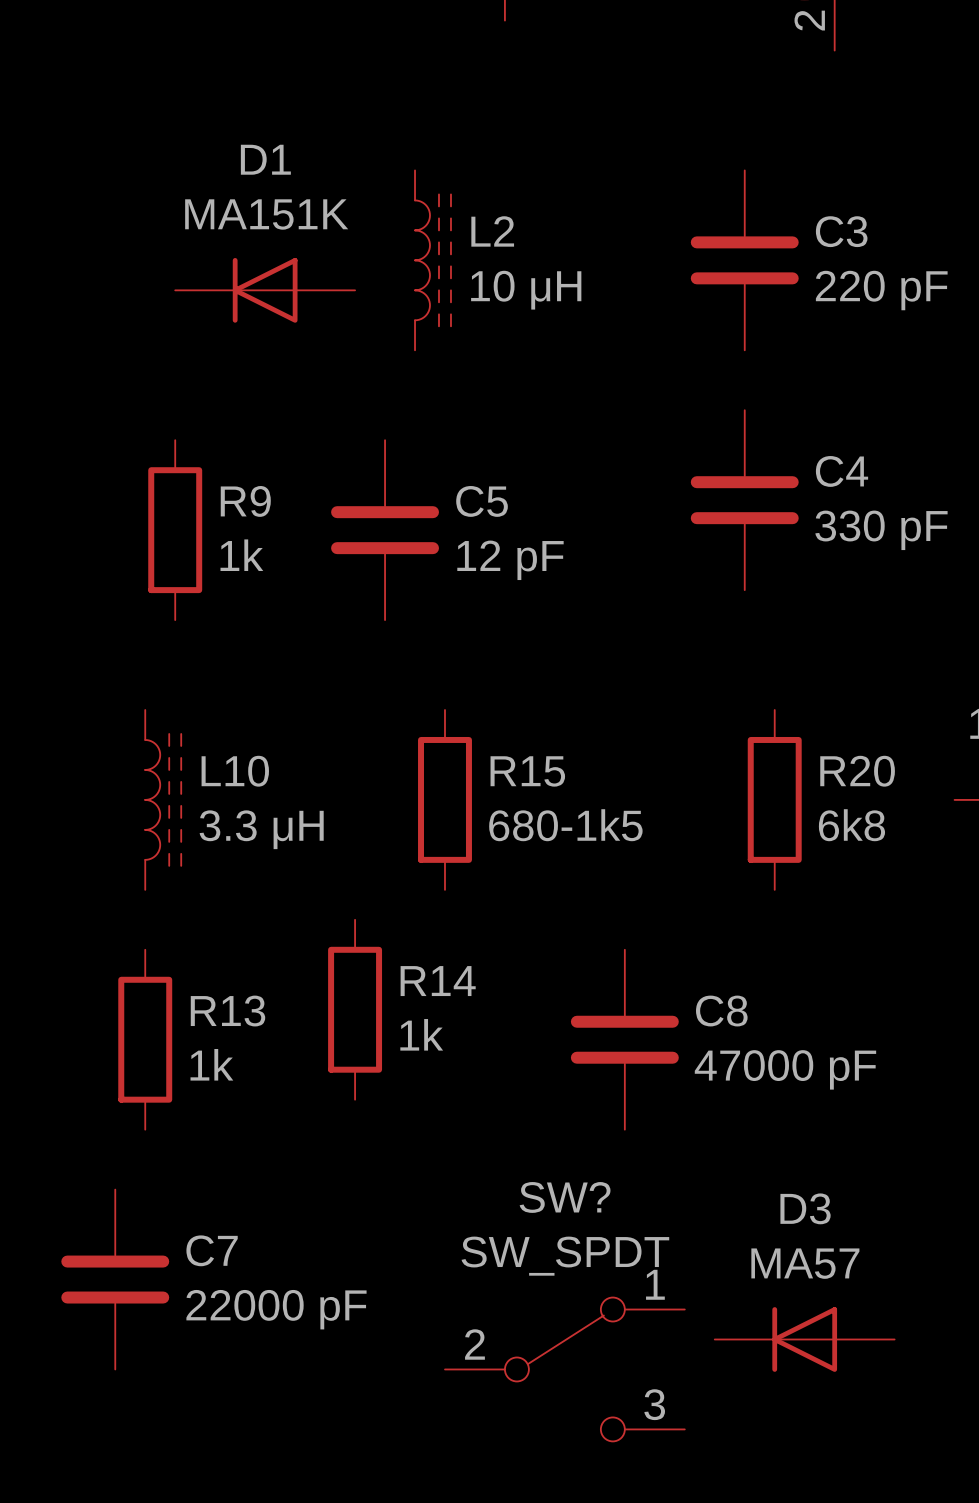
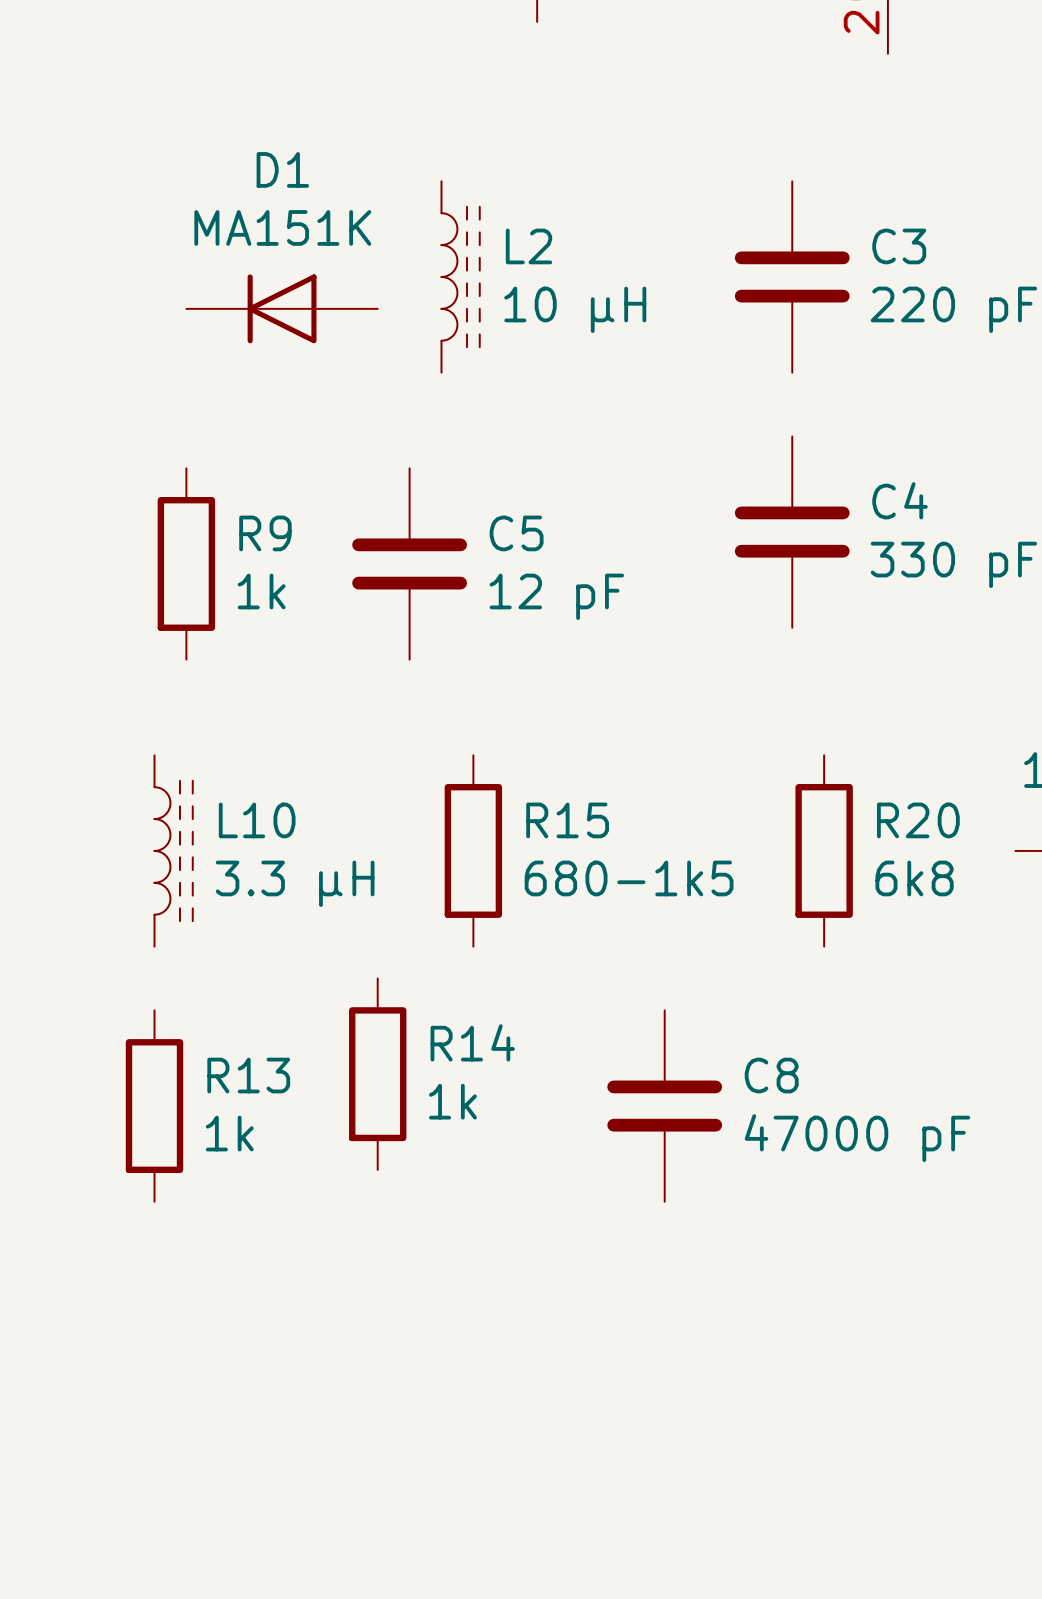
C7: 22000 pF (115, 1279) -> none
D3: MA57 (804, 1339) -> none
SW?: SW_SPDT (564, 1369) -> none

